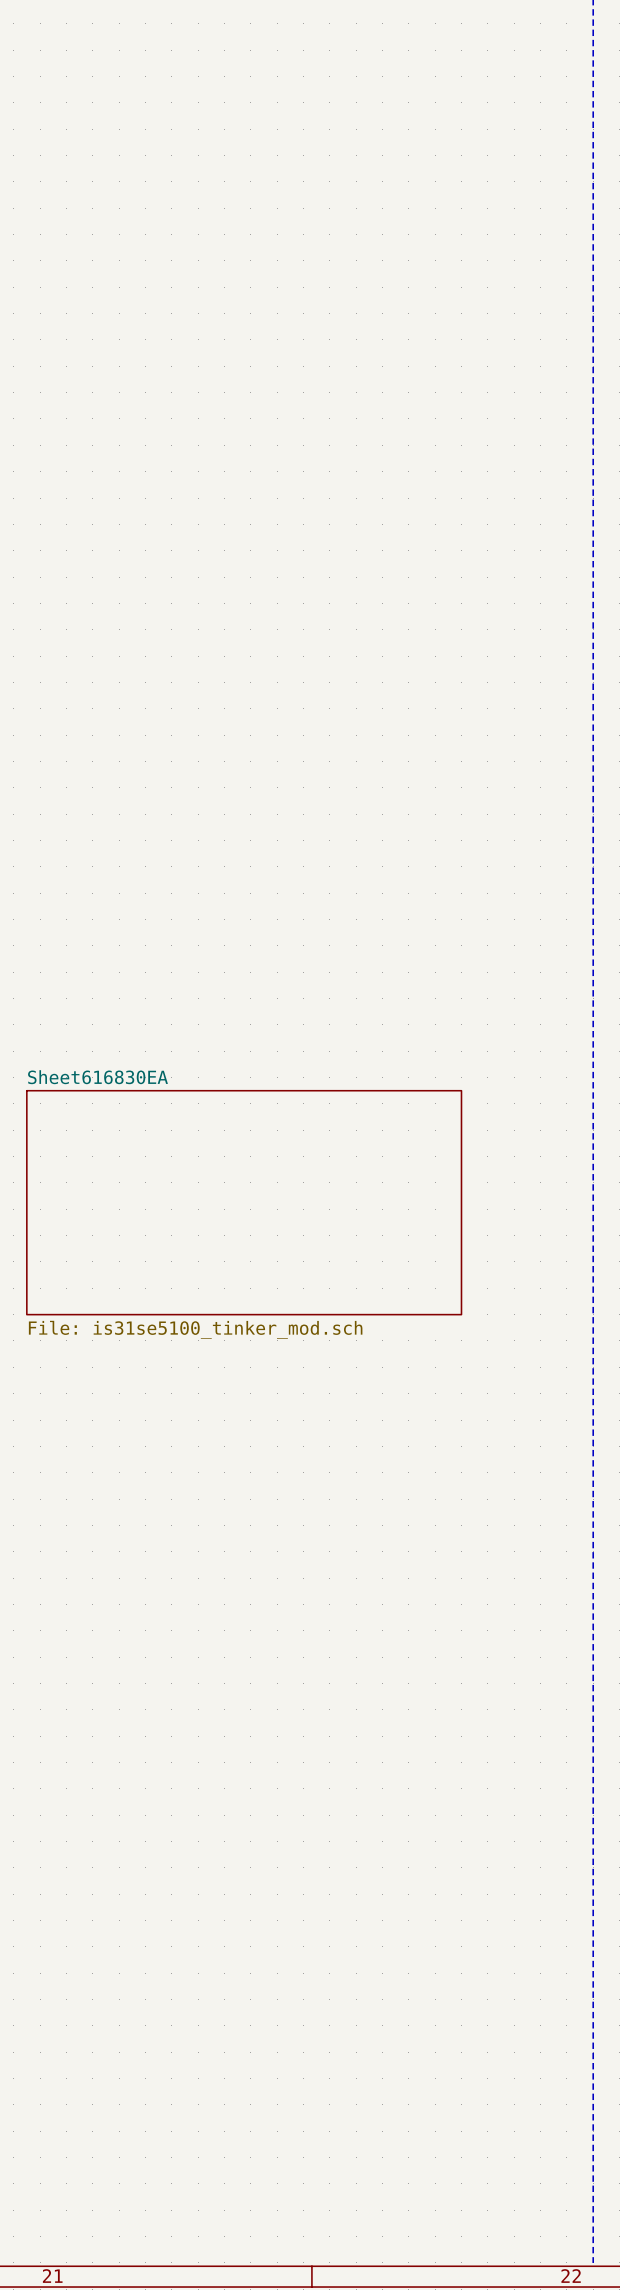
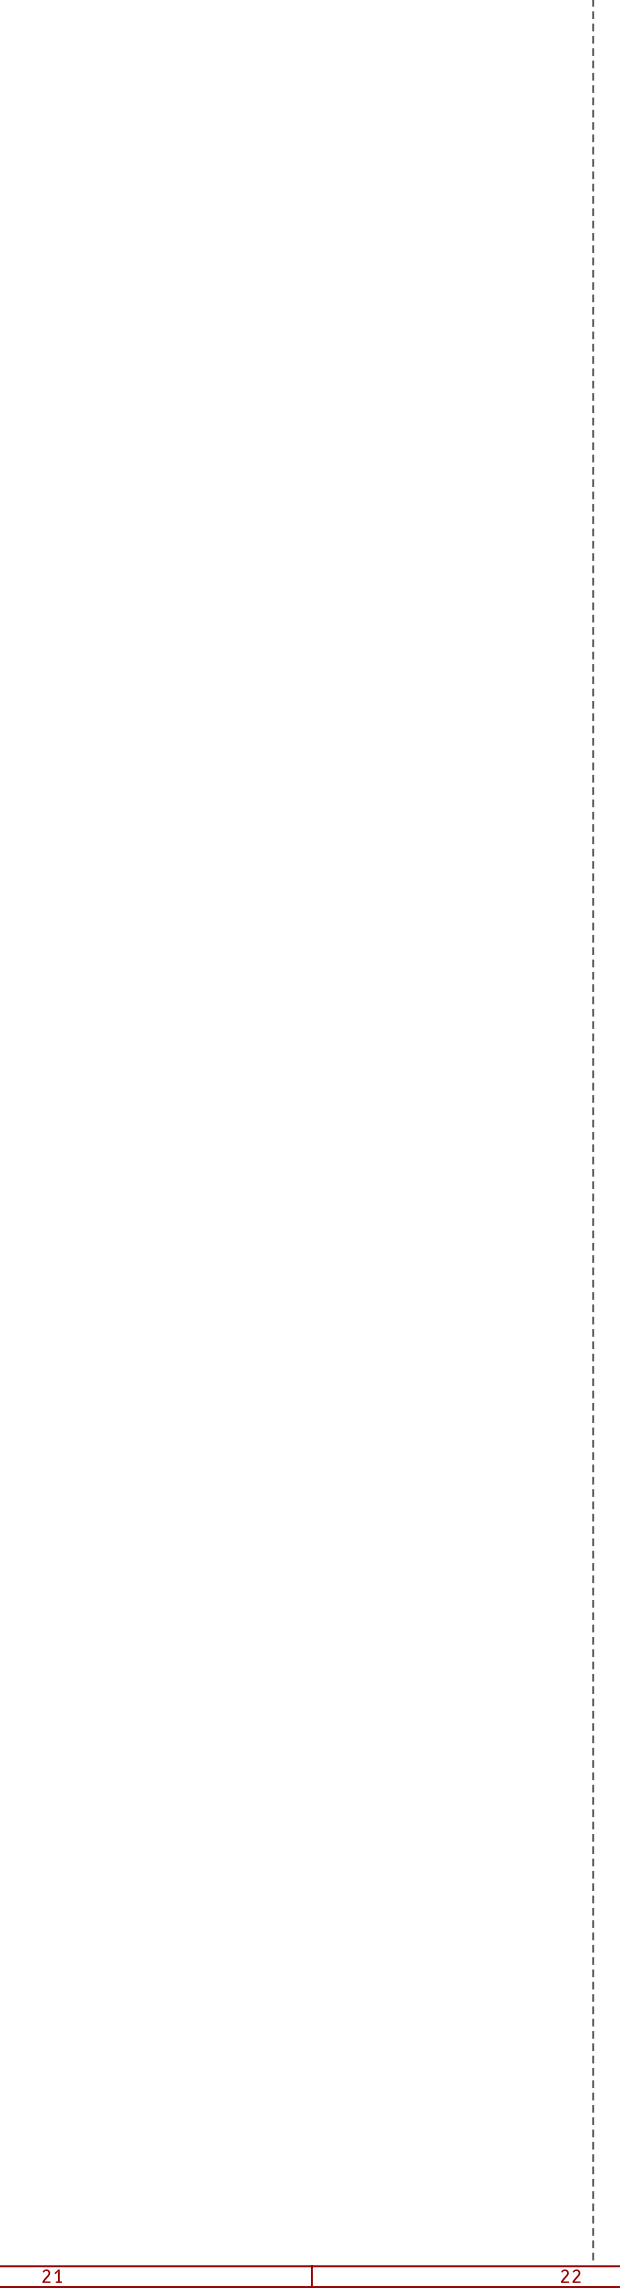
sheet Sheet616830EA: File: is31se5100_tinker_mod.sch (244, 1202) -> none

